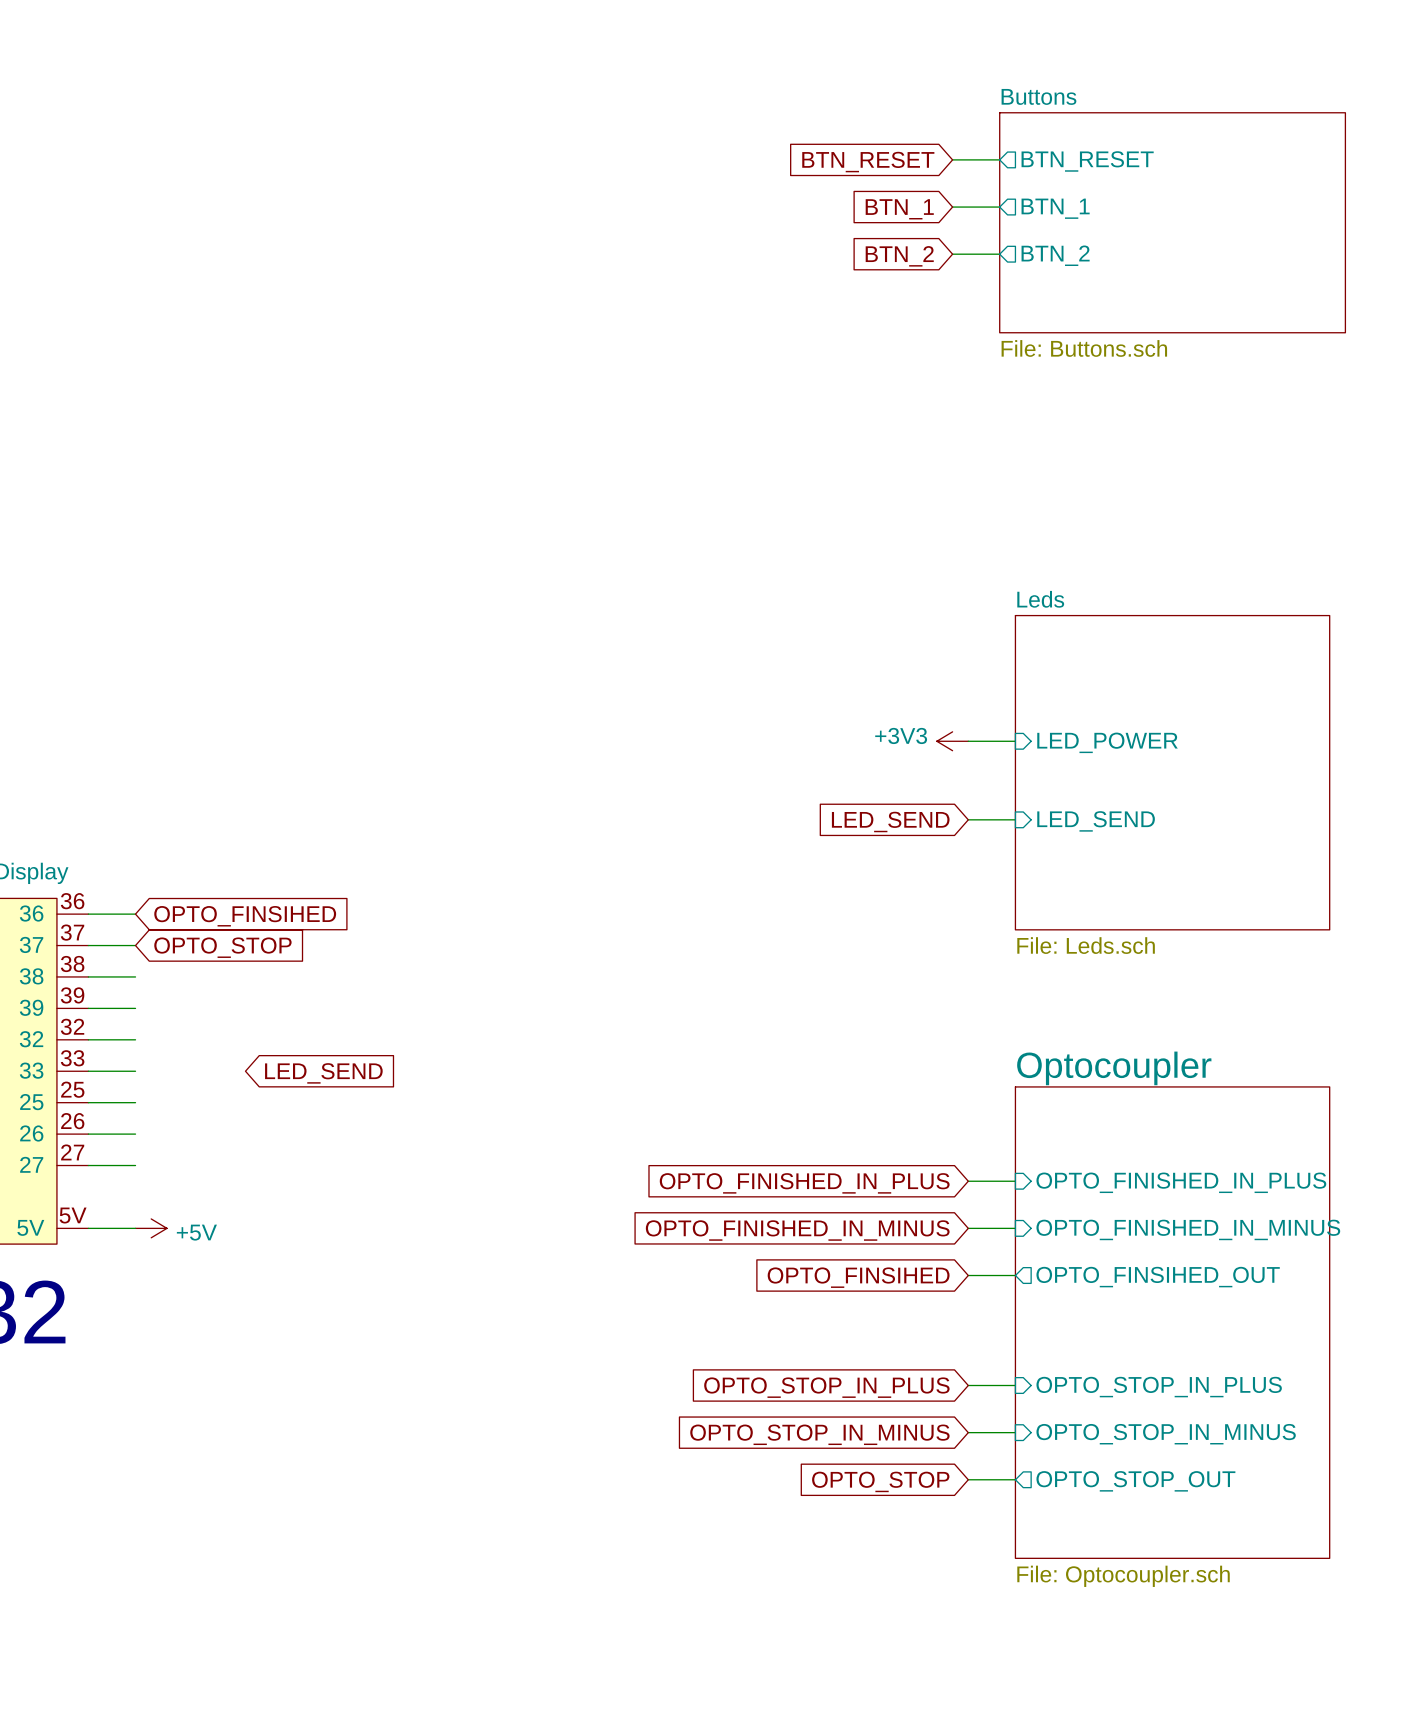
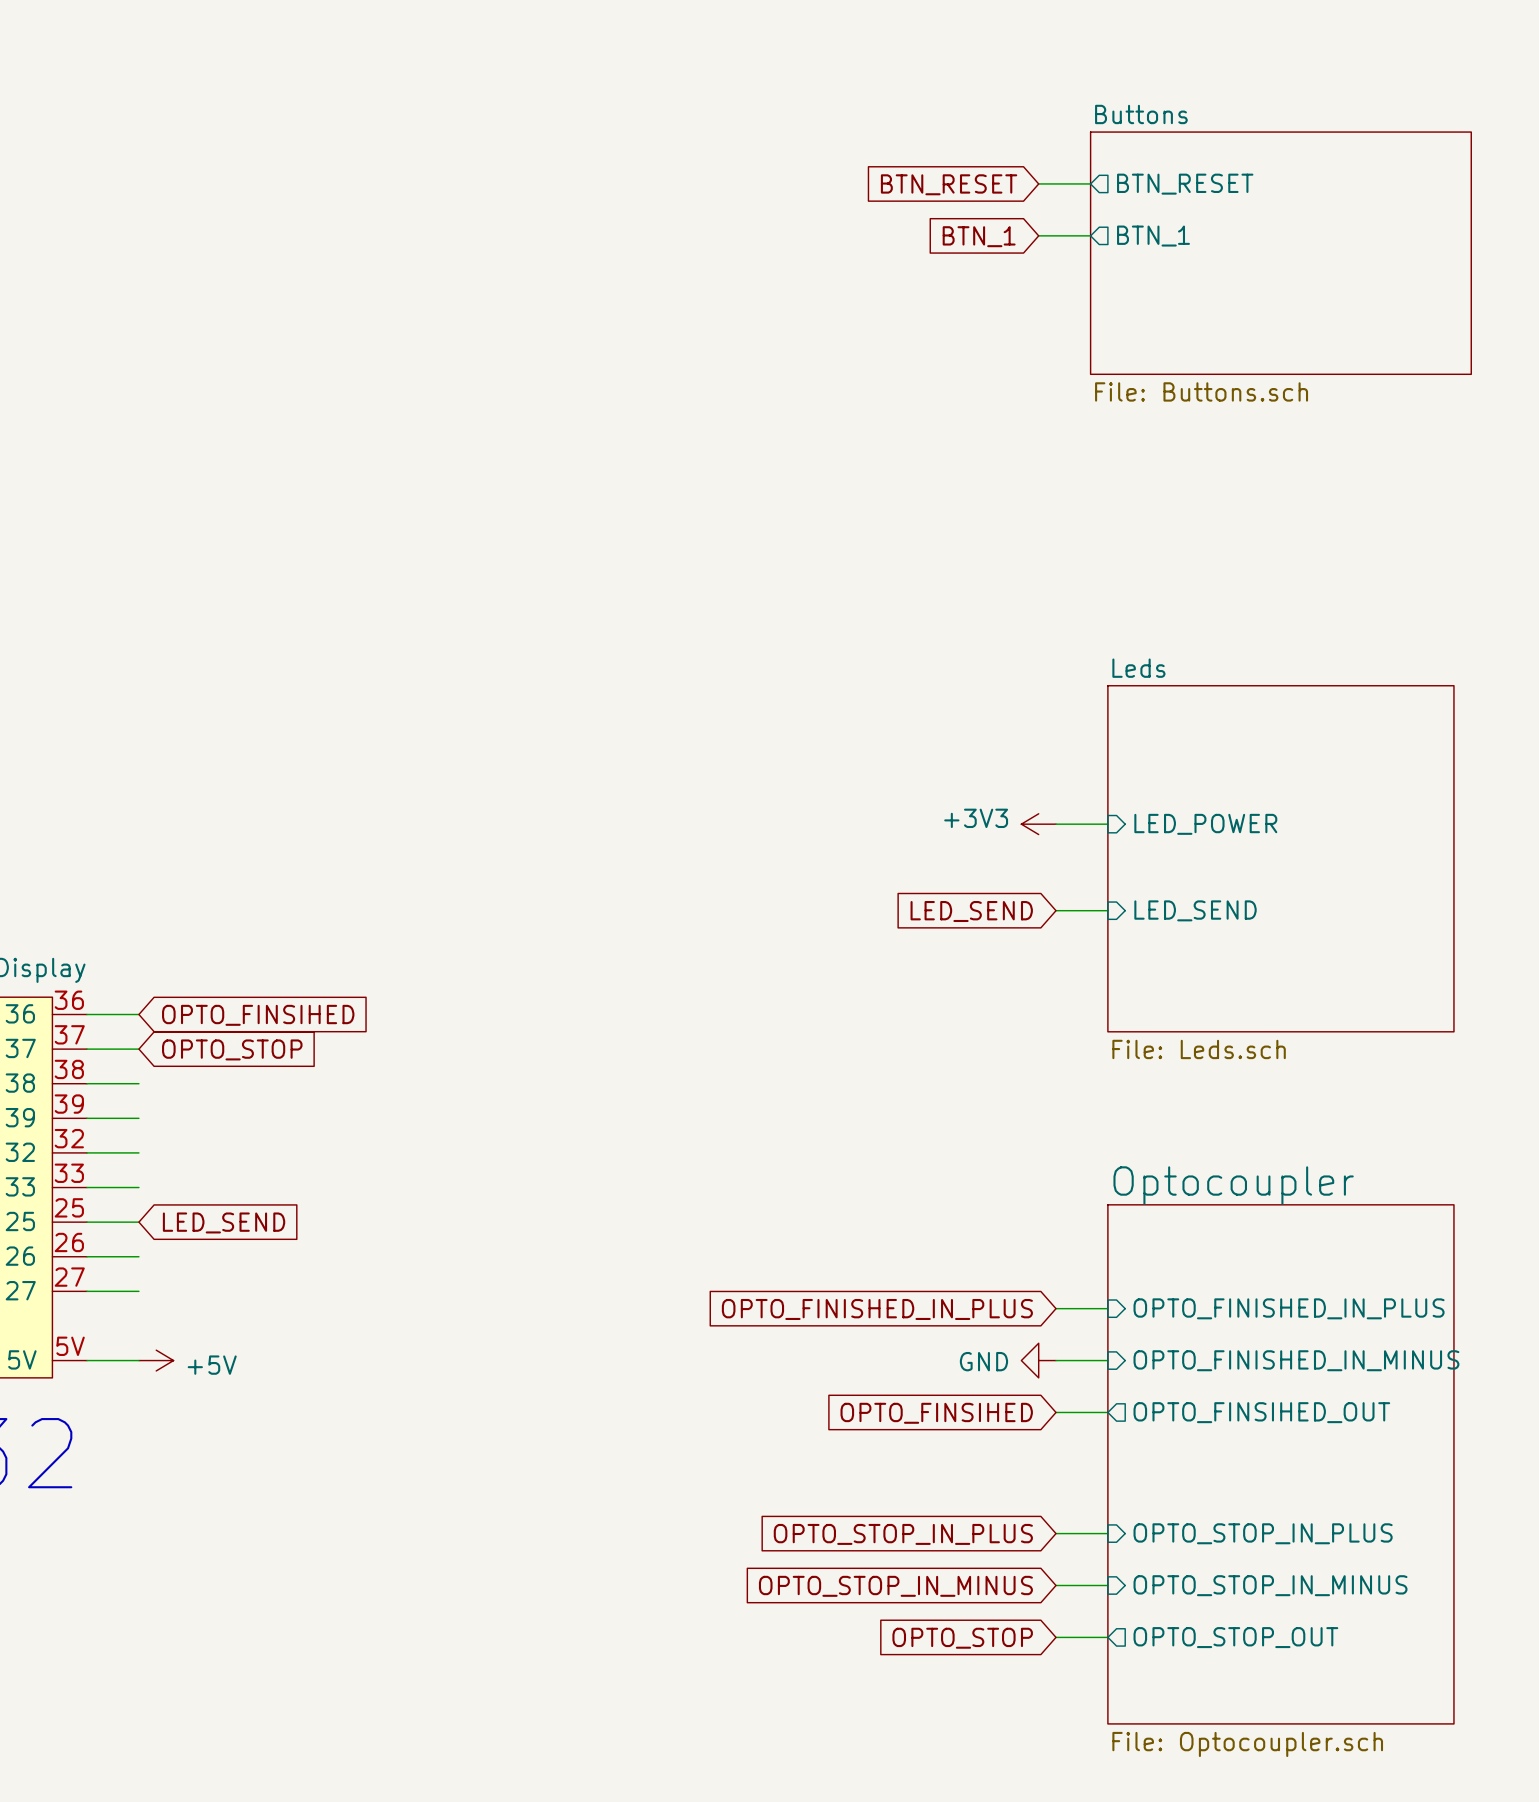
wire: (952, 254) (999, 254) -> none
sheet pin: BTN_2 (1055, 255) -> none
global label: BTN_2 (899, 256) -> none
global label position: LED_SEND (323, 1073) -> LED_SEND (224, 1222)
power symbol: none -> GND (1038, 1360)
global label: OPTO_FINISHED_IN_MINUS (797, 1230) -> none

